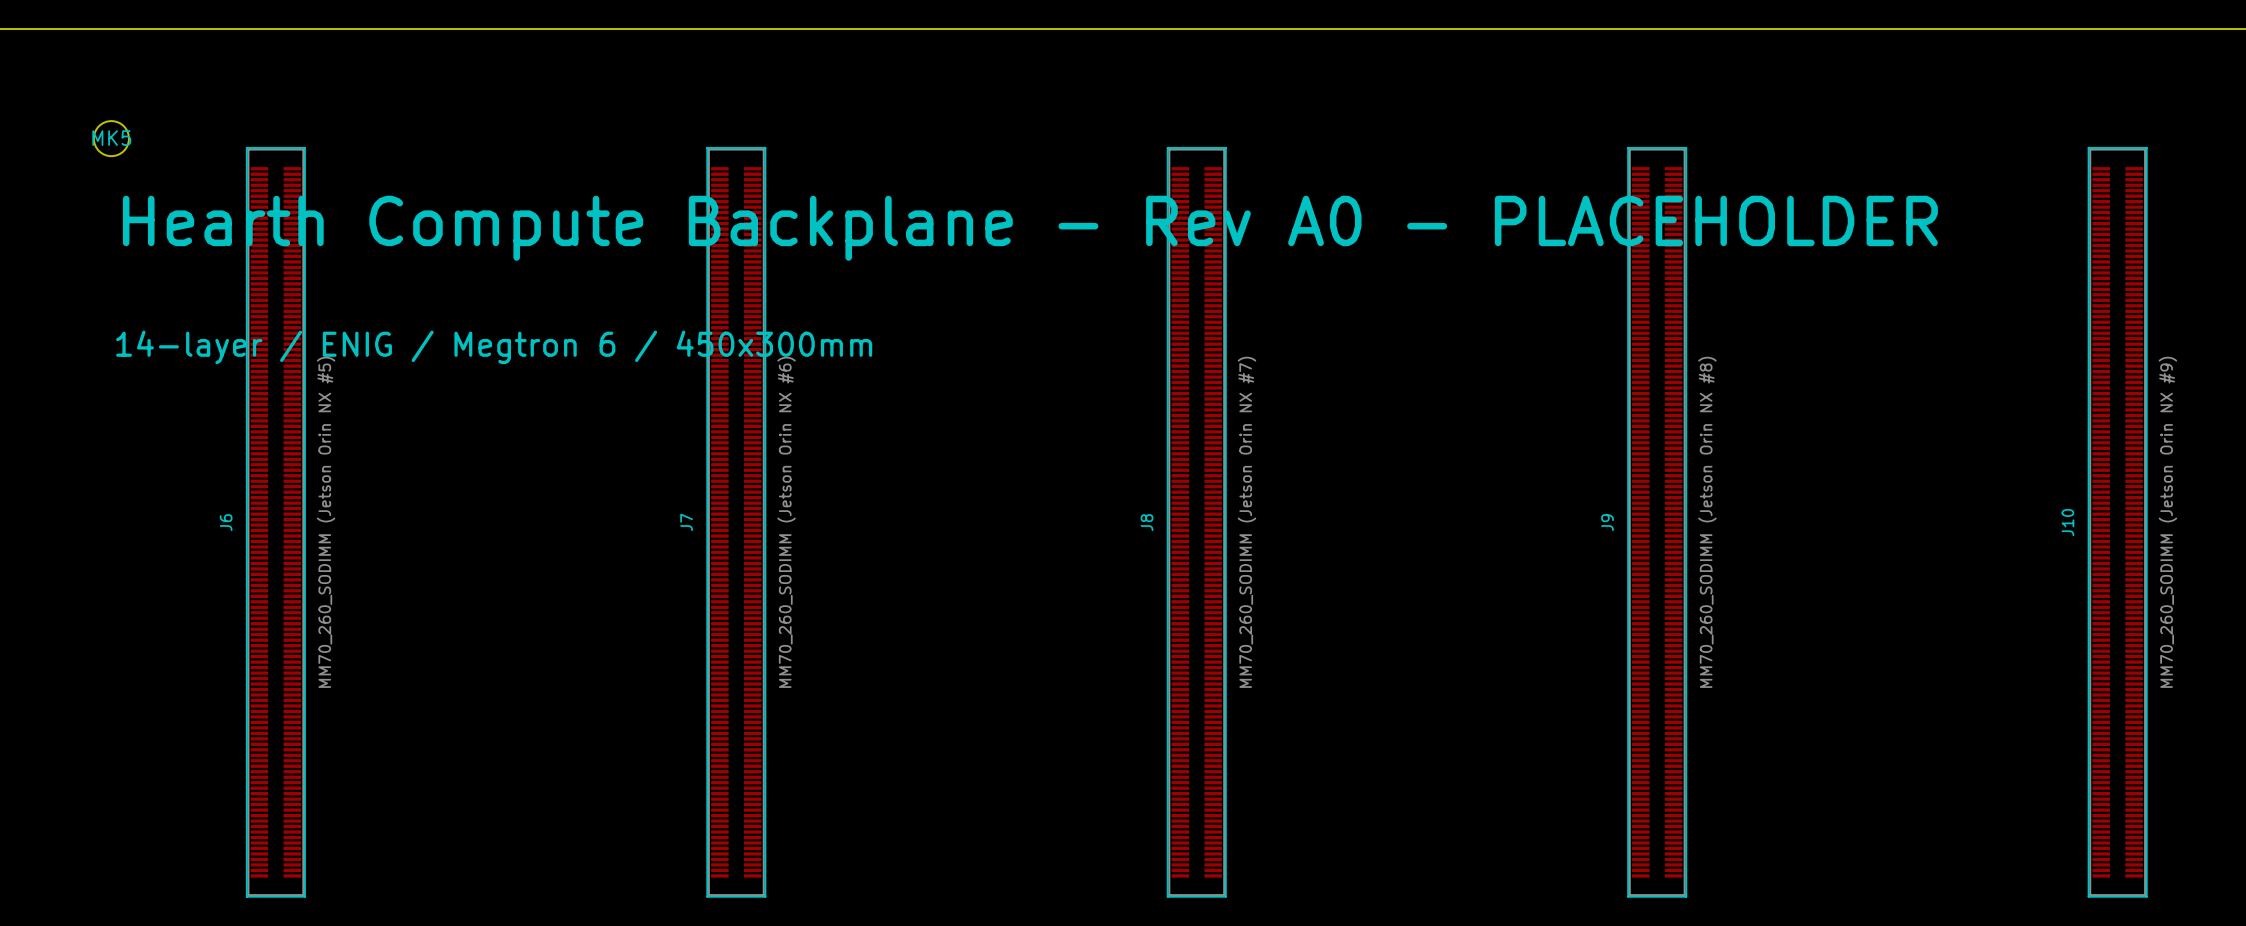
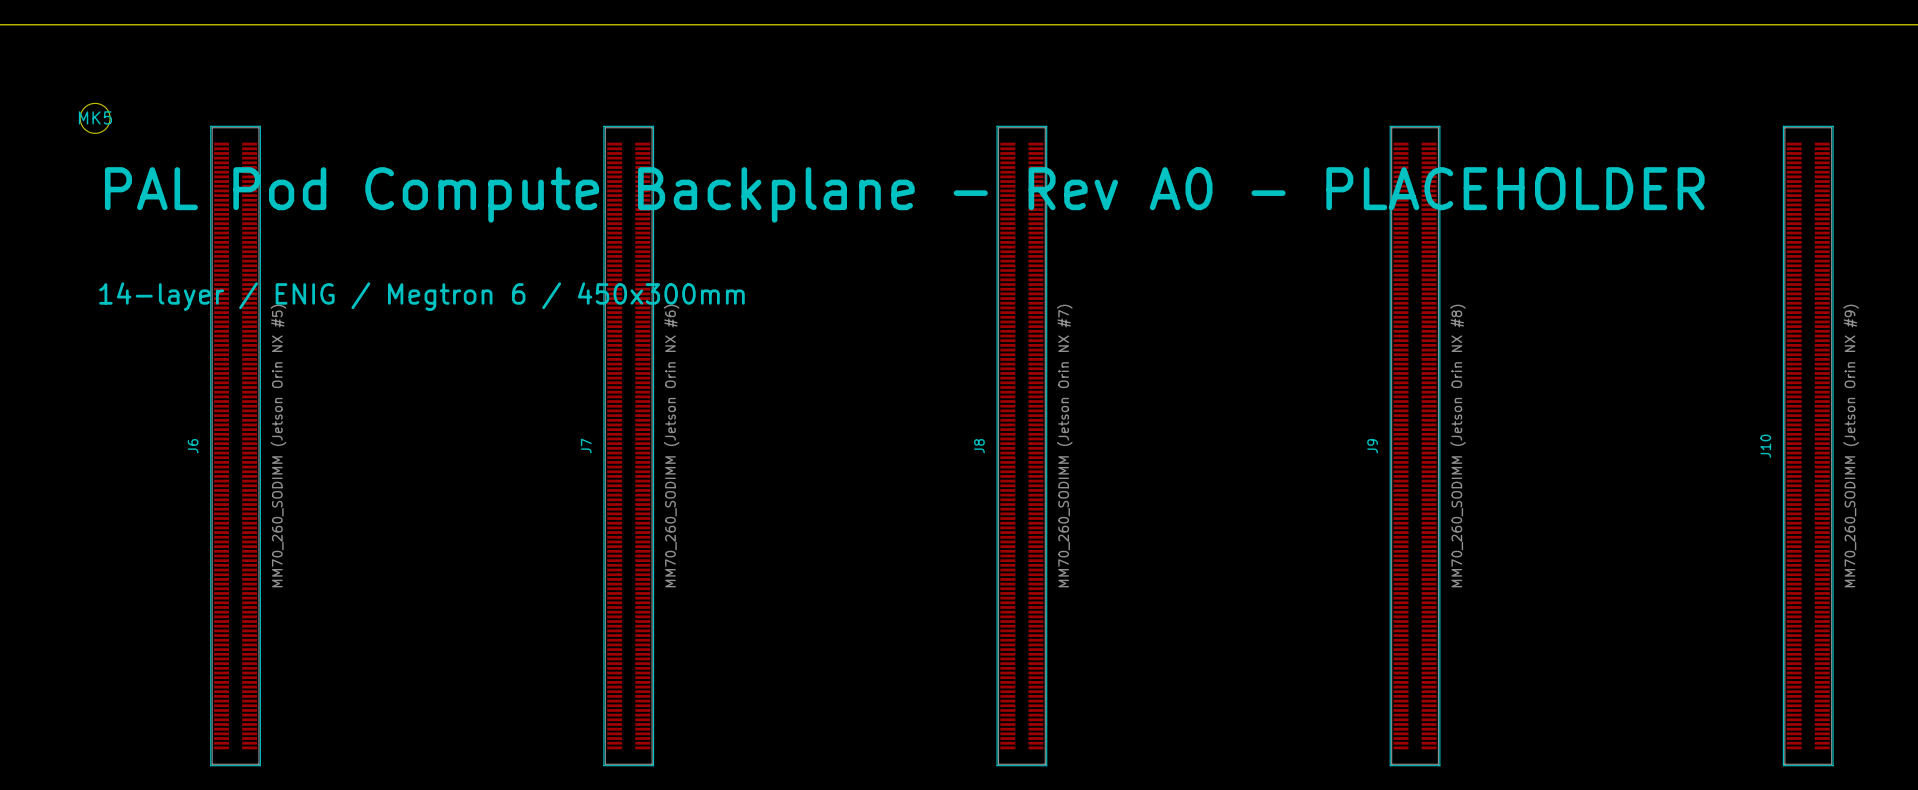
text: Hearth Compute Backplane - Rev A0 - PLACEHOLDER (1030, 228) -> PAL Pod Compute Backplane - Rev A0 - PLACEHOLDER (904, 194)

